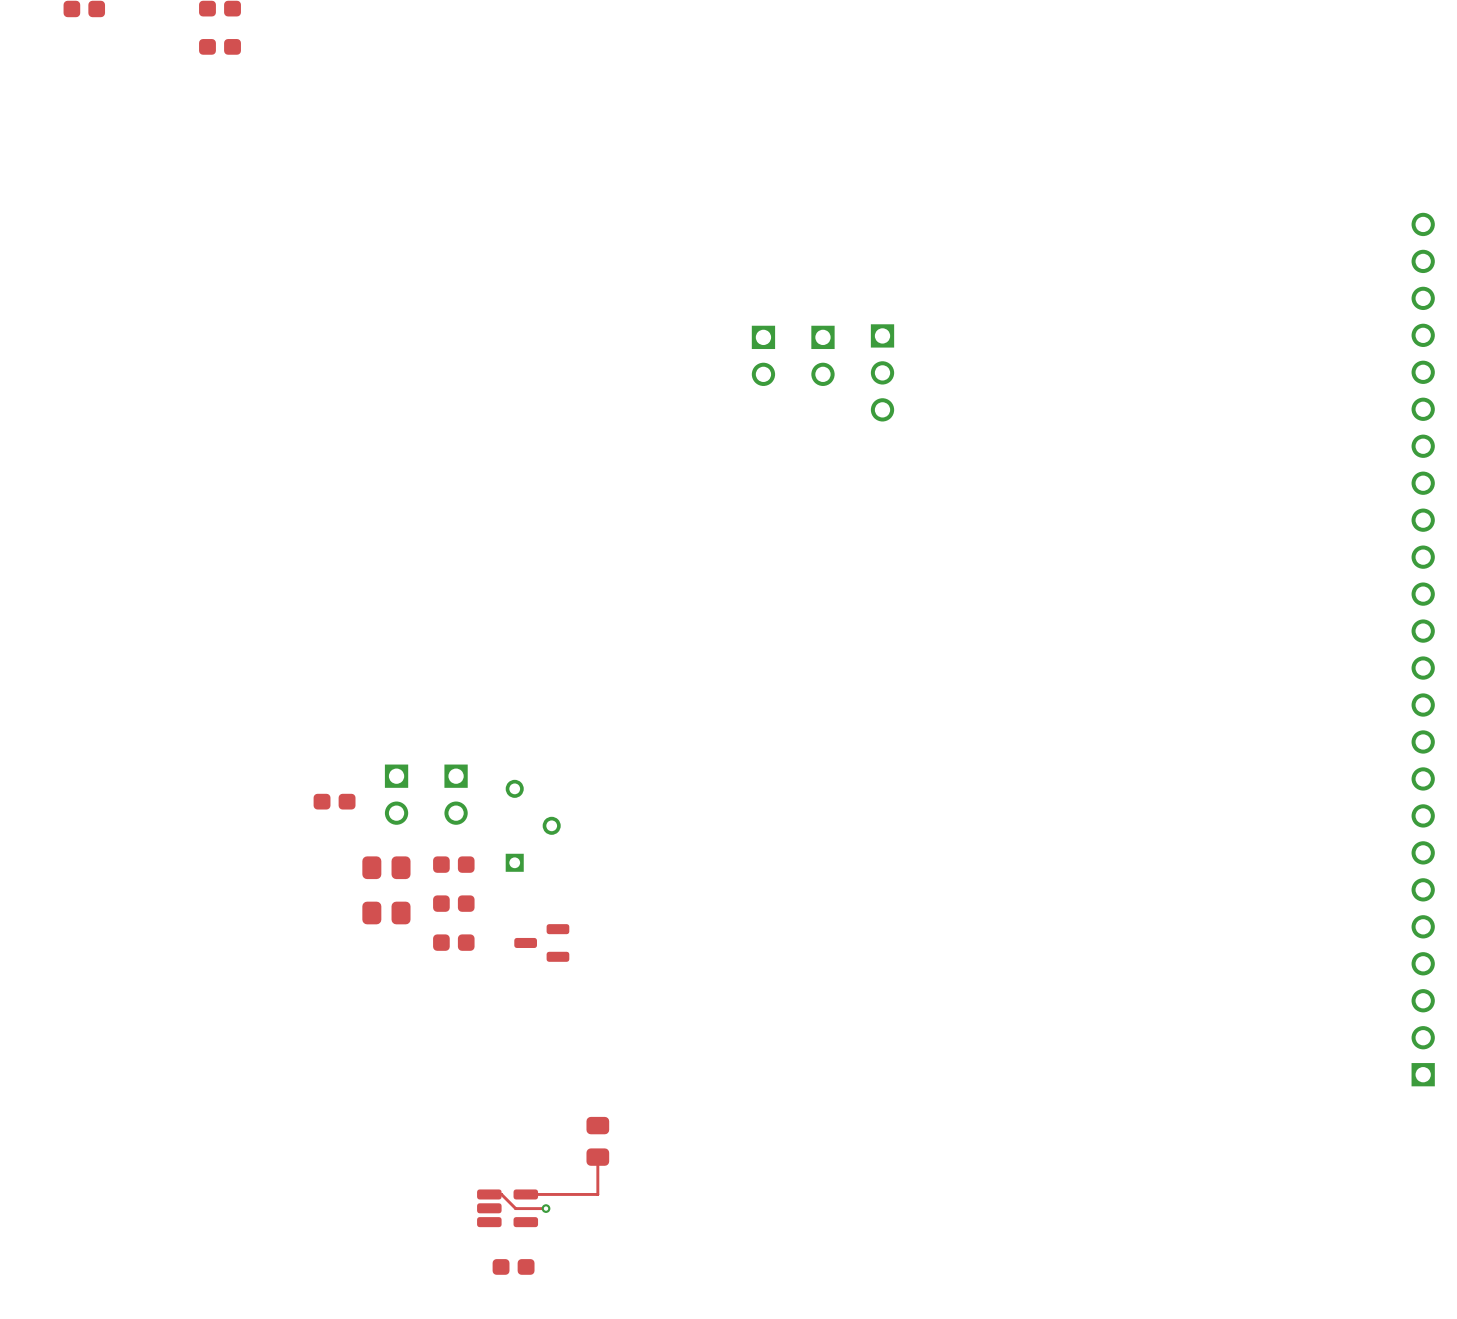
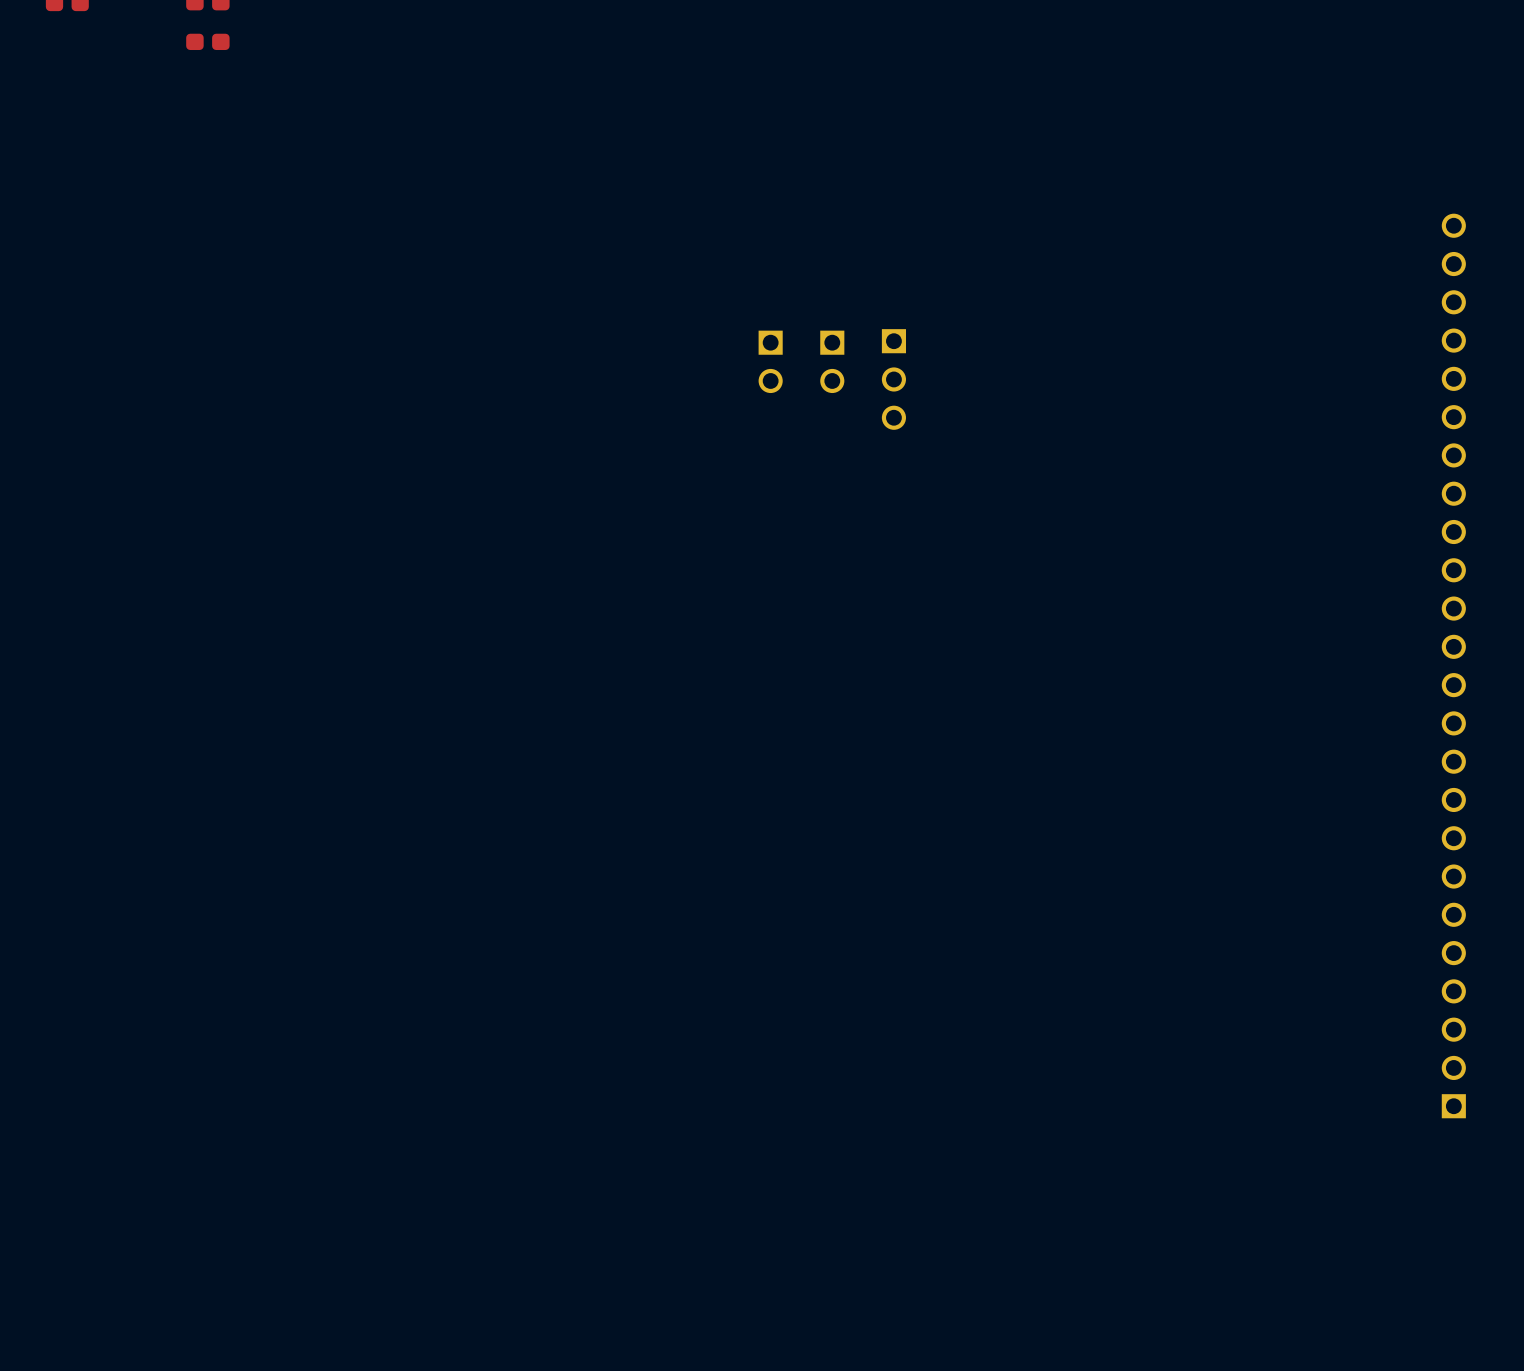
part: (396, 794) -> none
part: (456, 794) -> none
part: (334, 801) -> none
part: (533, 825) -> none
part: (453, 864) -> none
part: (386, 867) -> none
part: (453, 903) -> none
part: (386, 912) -> none
part: (453, 942) -> none
part: (541, 942) -> none
part: (597, 1141) -> none
top track: (597, 1157) (597, 1194) (525, 1194) -> none
top track: (489, 1194) (501, 1194) (515, 1208) (546, 1208) -> none
part: (507, 1208) -> none
via: (546, 1208) -> none
part: (513, 1266) -> none

